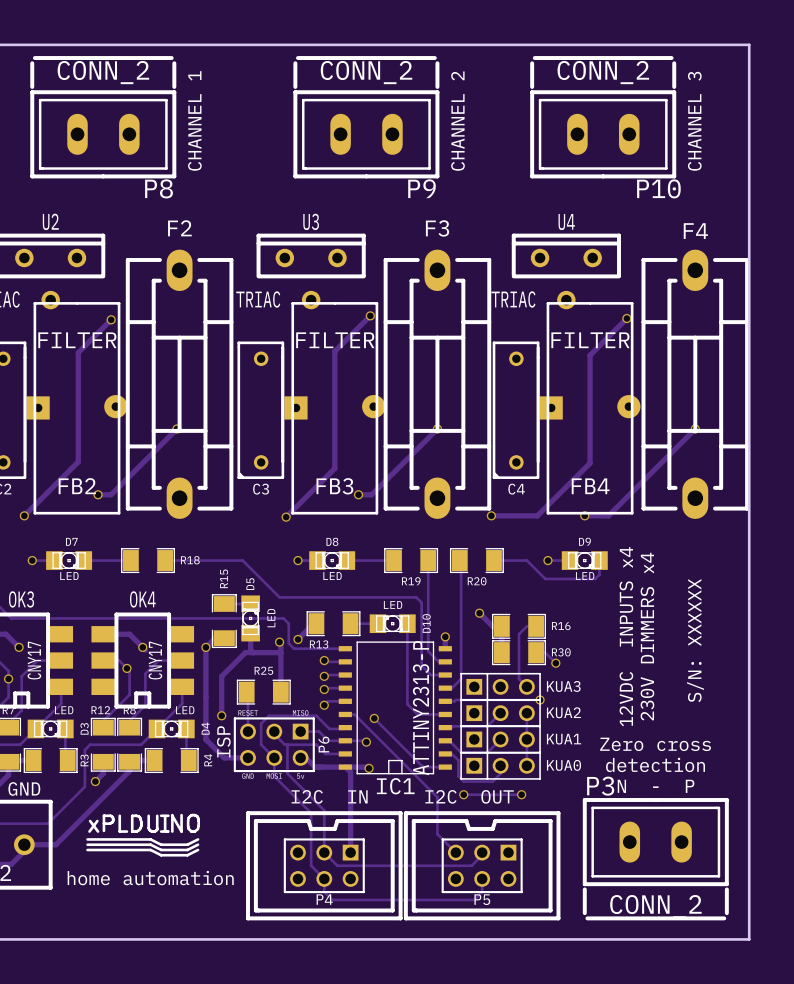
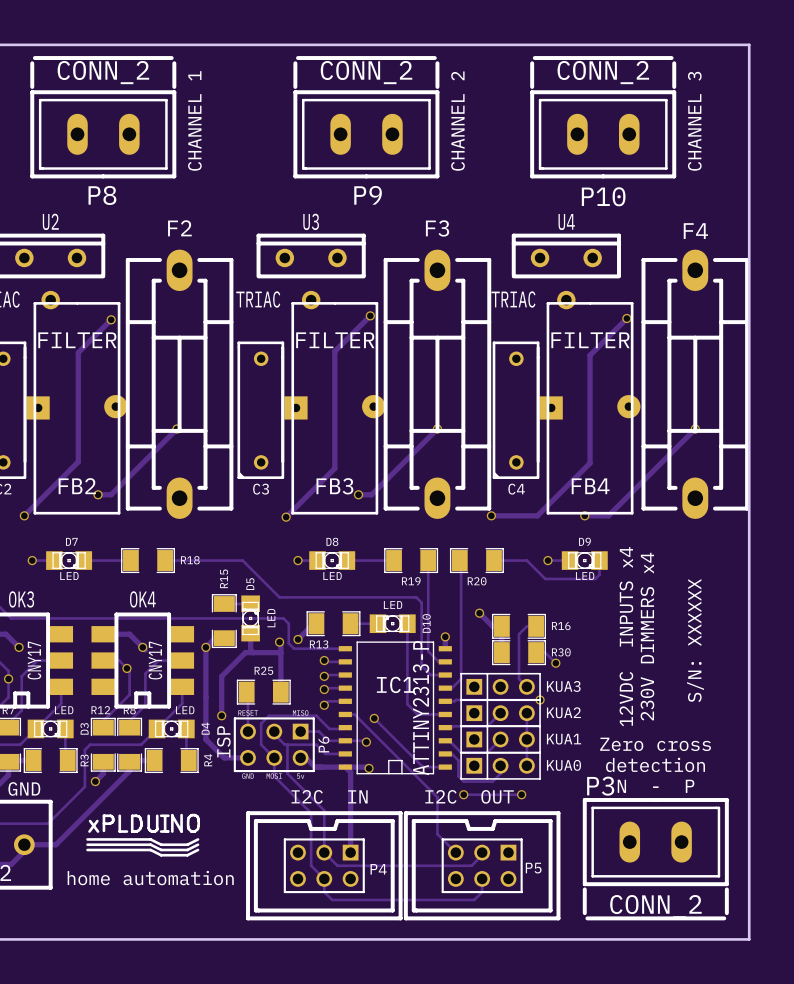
P8 name position: P8 (159, 188) -> P8 (102, 195)
P9 name position: P9 (422, 188) -> P9 (368, 195)
P10 name position: P10 (658, 188) -> P10 (603, 196)
IC1 name position: IC1 (395, 786) -> IC1 (395, 684)
P4 name position: P4 (324, 899) -> P4 (378, 869)
P5 name position: P5 (482, 899) -> P5 (533, 868)

